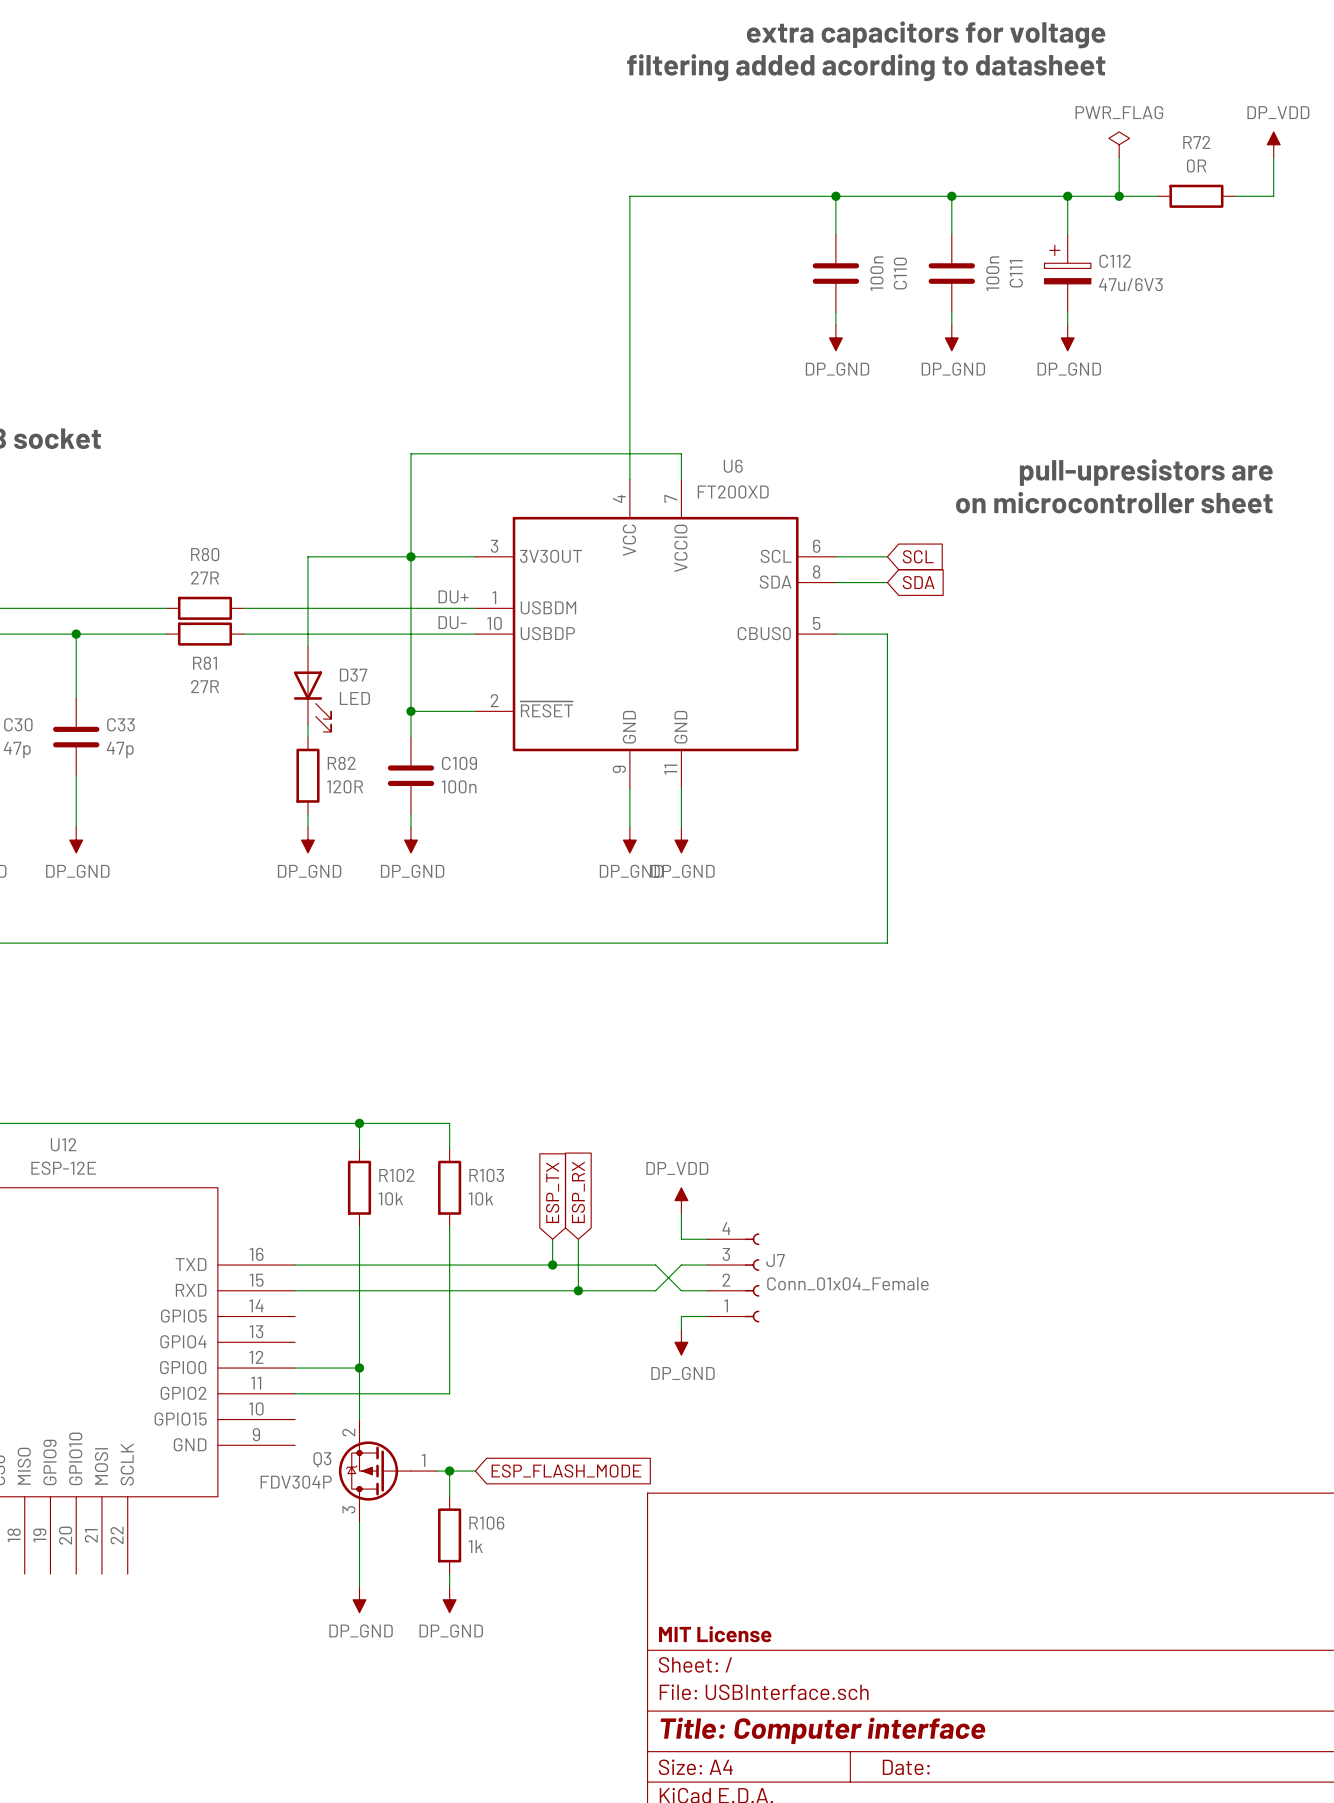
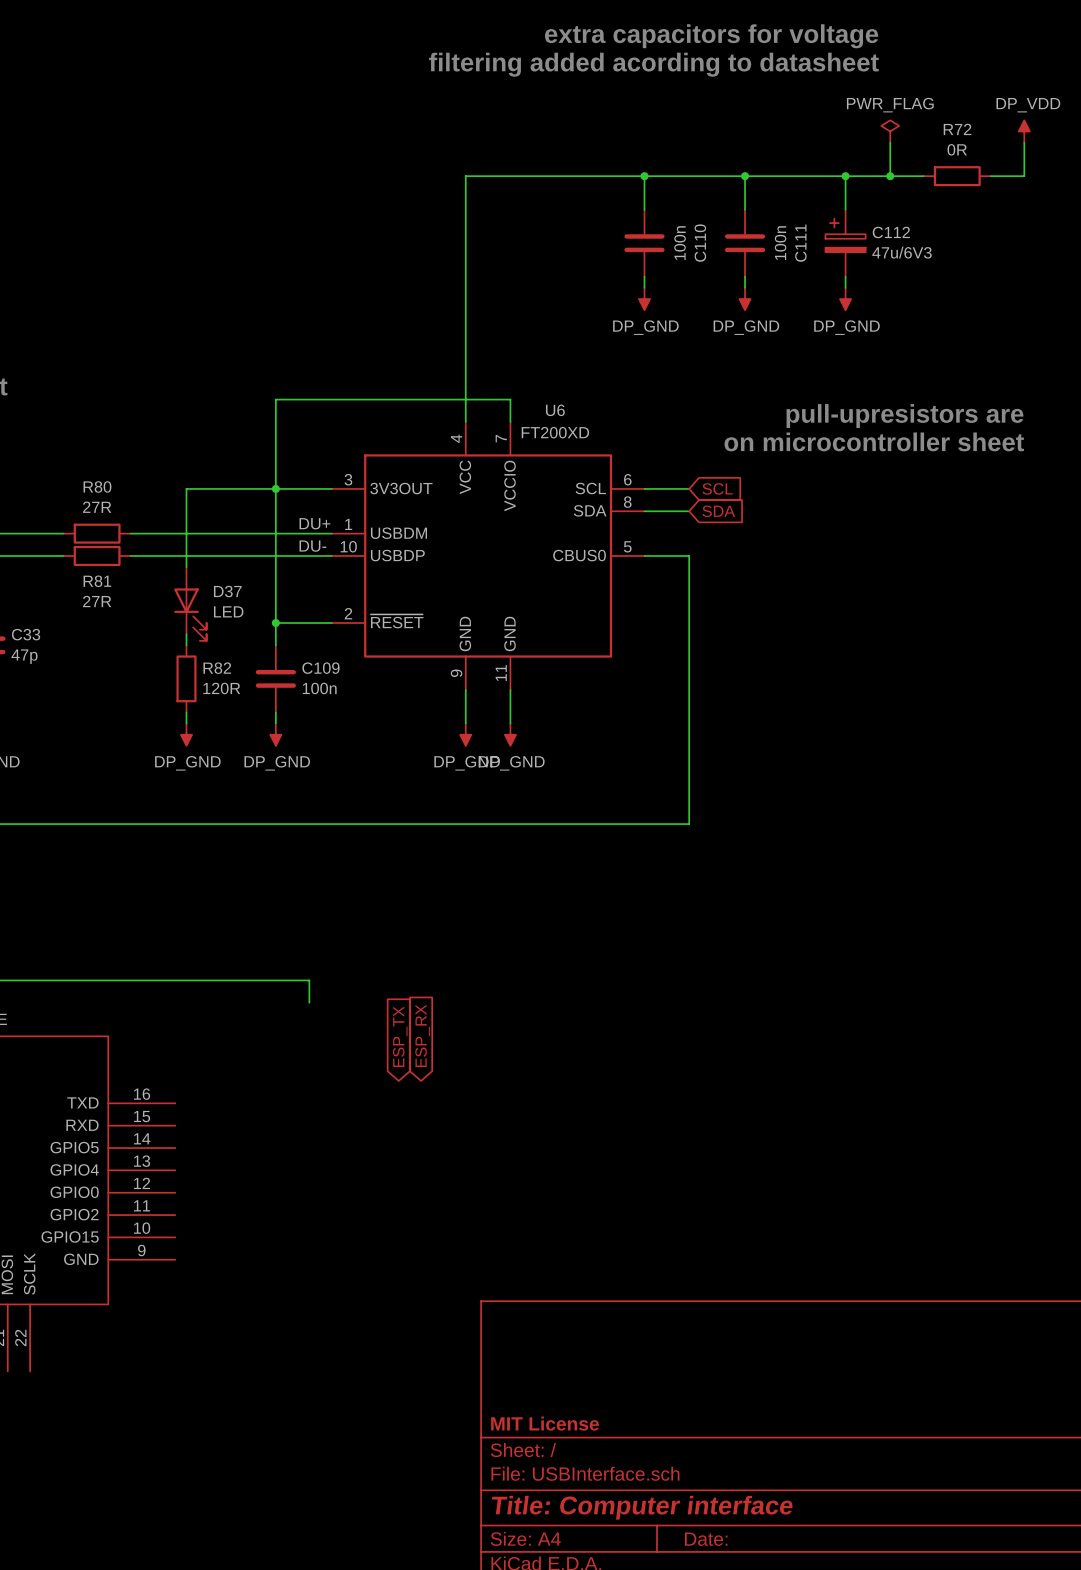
wire: (359, 1123) (359, 1149) -> none
junction: (359, 1123) -> none
R102: 10k (359, 1187) -> none
R103: 10k (449, 1187) -> none
power symbol: DP_VDD (681, 1200) -> none
wire: (681, 1213) (681, 1239) (707, 1239) -> none
wire: (359, 1226) (359, 1419) -> none
wire: (449, 1226) (449, 1393) (295, 1393) -> none
wire: (552, 1239) (552, 1265) -> none
wire: (578, 1239) (578, 1290) -> none
wire: (295, 1265) (655, 1265) (681, 1290) (707, 1290) -> none
junction: (552, 1265) -> none
wire: (707, 1265) (681, 1265) (655, 1290) (295, 1290) -> none
J7: Conn_01x04_Female (733, 1277) -> none
junction: (578, 1290) -> none
wire: (707, 1316) (681, 1316) (681, 1329) -> none
power symbol: DP_GND (681, 1342) -> none
wire: (295, 1368) (359, 1368) -> none
junction: (359, 1368) -> none
Q3: FDV304P (387, 1471) -> none
wire: (436, 1471) (475, 1471) -> none
wire: (449, 1471) (449, 1496) -> none
junction: (449, 1471) -> none
global label: ESP_FLASH_MODE (566, 1471) -> none
wire: (359, 1522) (359, 1586) -> none
R106: 1k (449, 1535) -> none
wire: (449, 1574) (449, 1586) -> none
power symbol: DP_GND (359, 1599) -> none
power symbol: DP_GND (449, 1599) -> none

